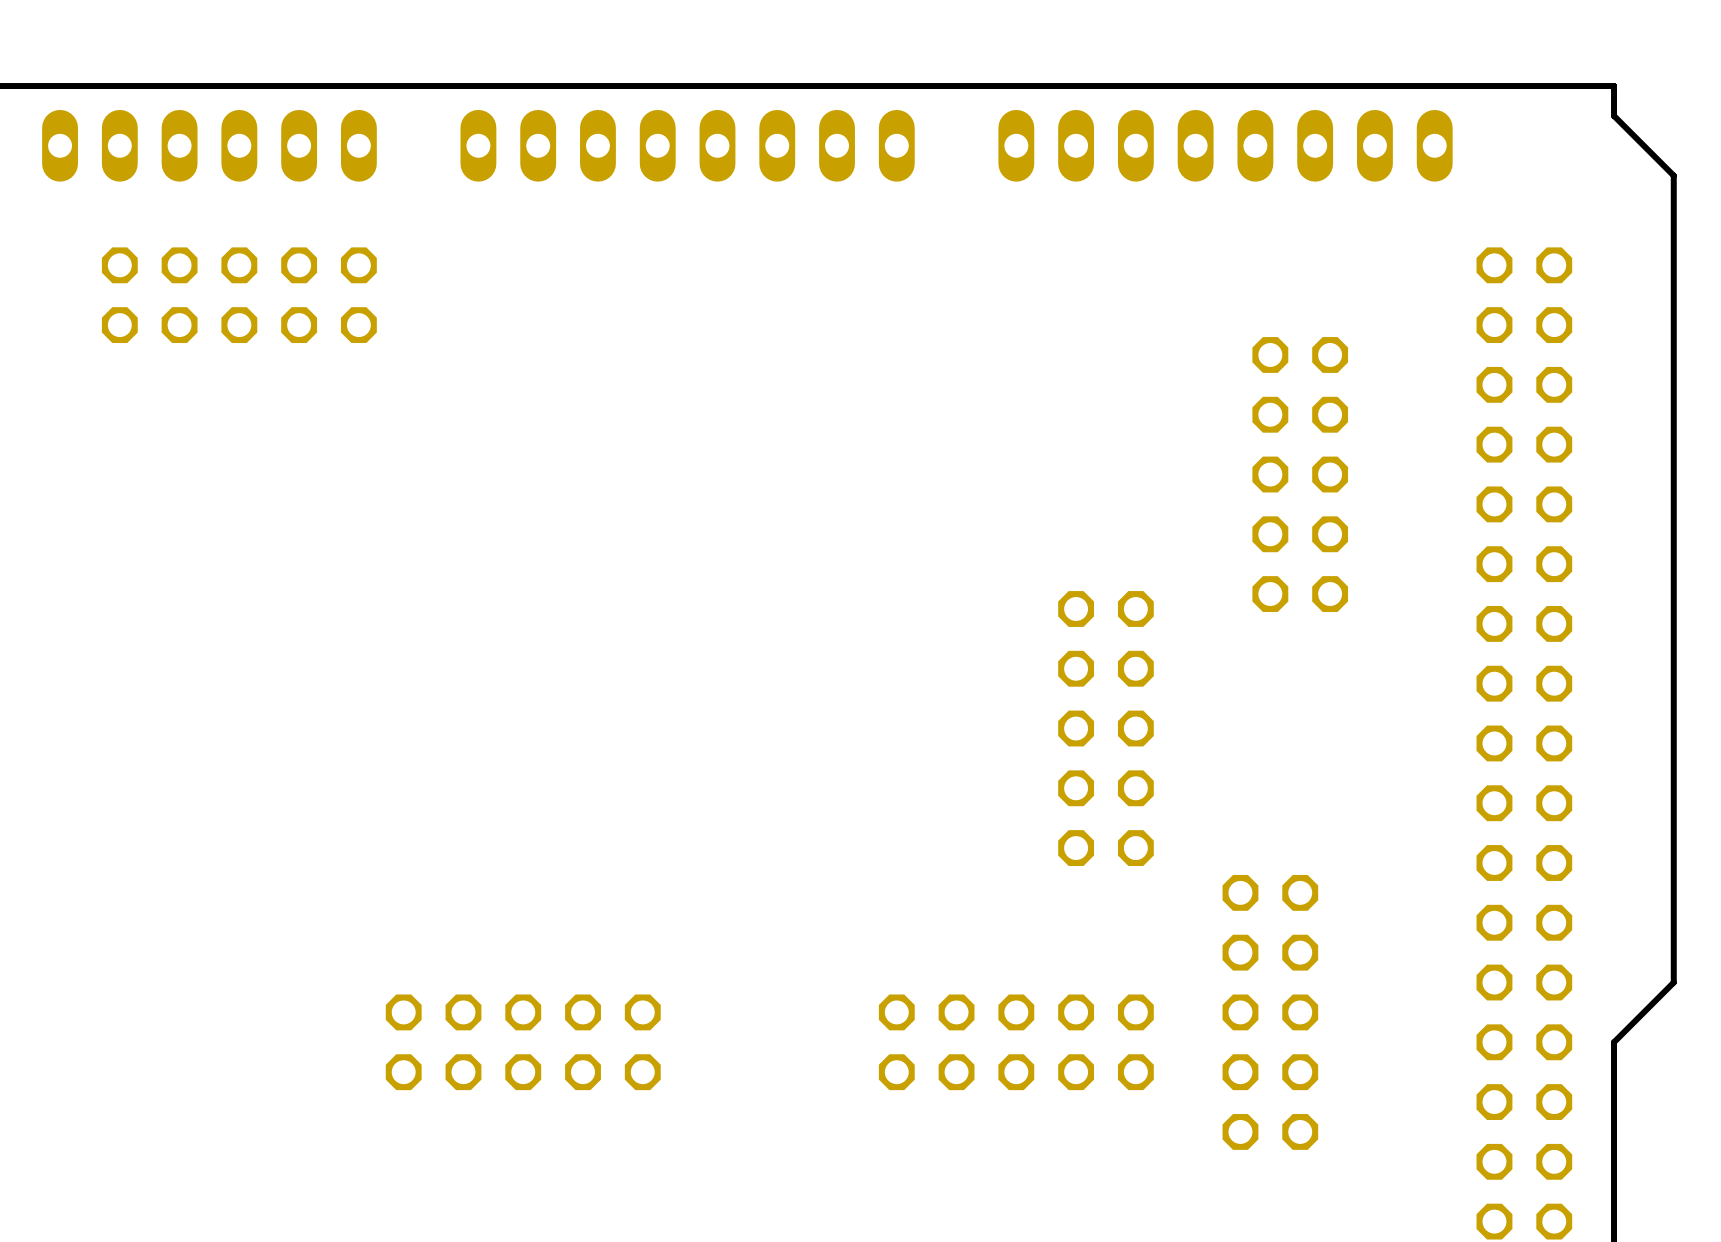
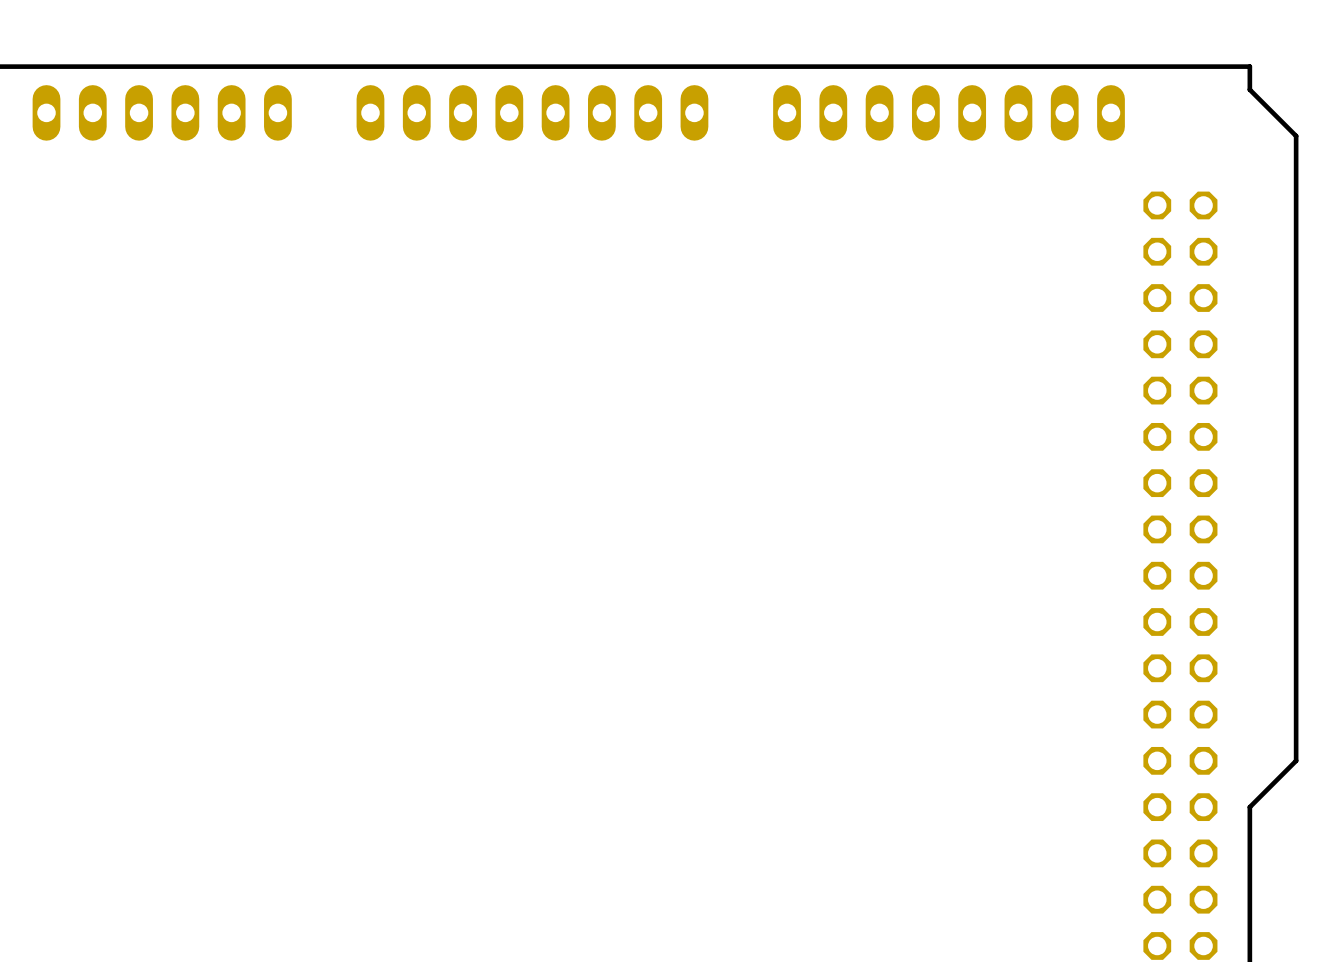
part: (239, 295) -> none
part: (1300, 474) -> none
part: (1105, 728) -> none
part: (1270, 1012) -> none
part: (523, 1042) -> none
part: (1016, 1042) -> none

